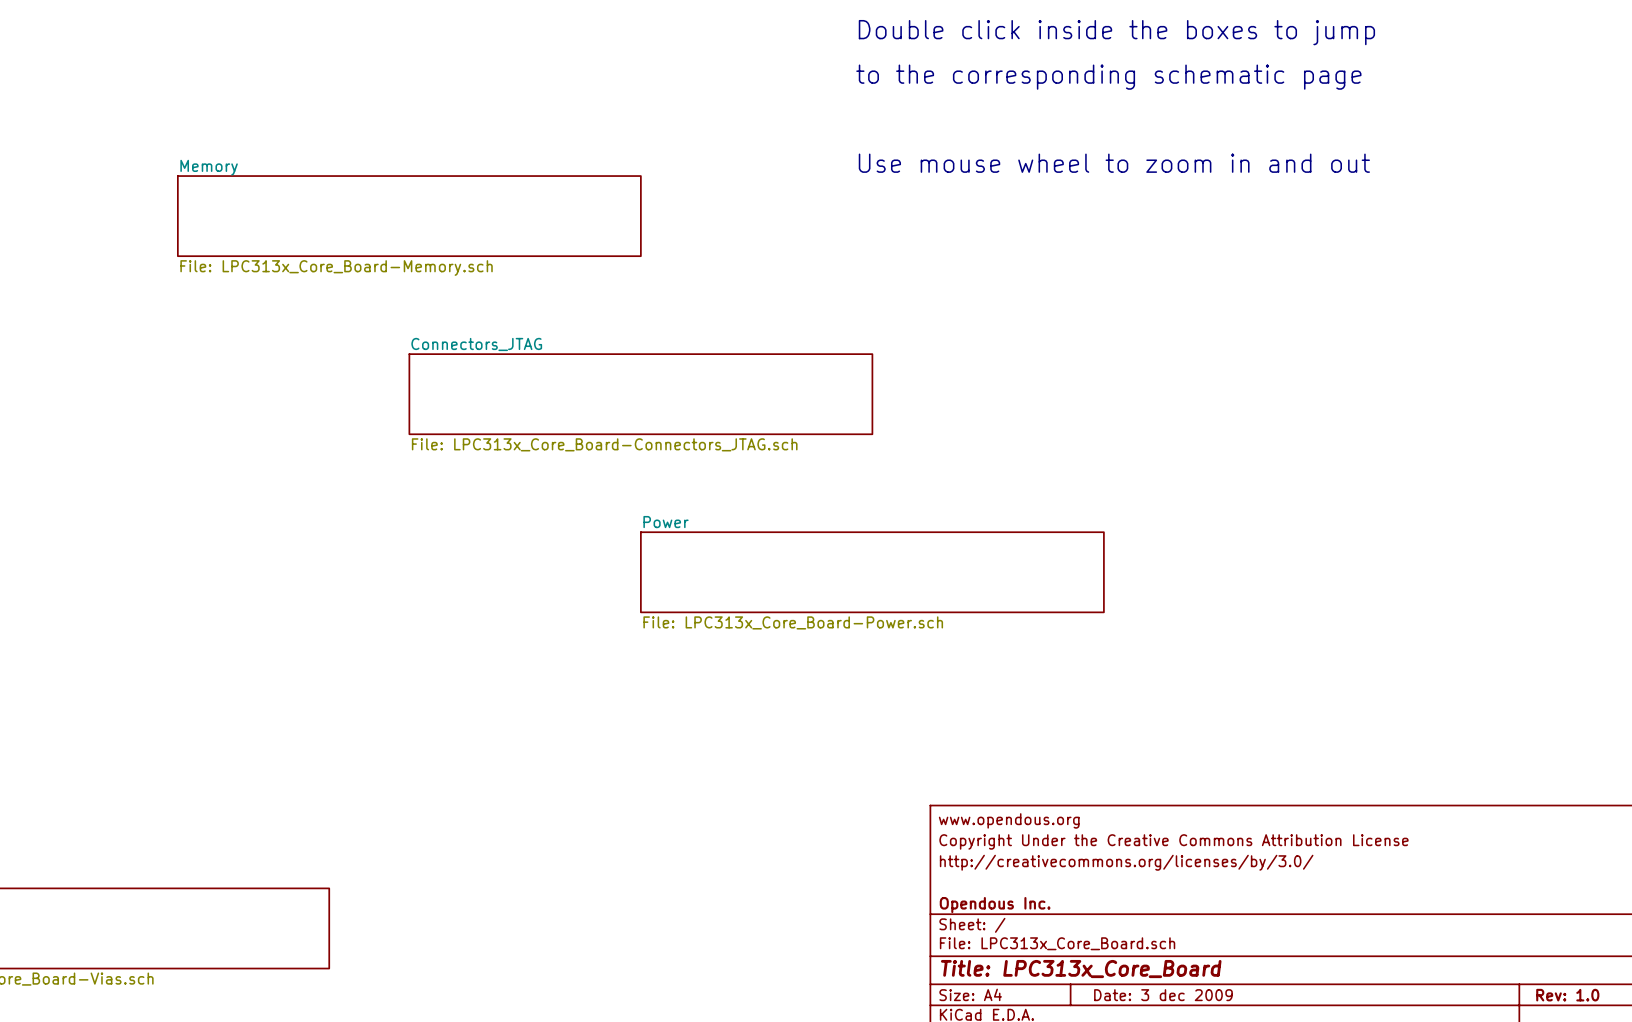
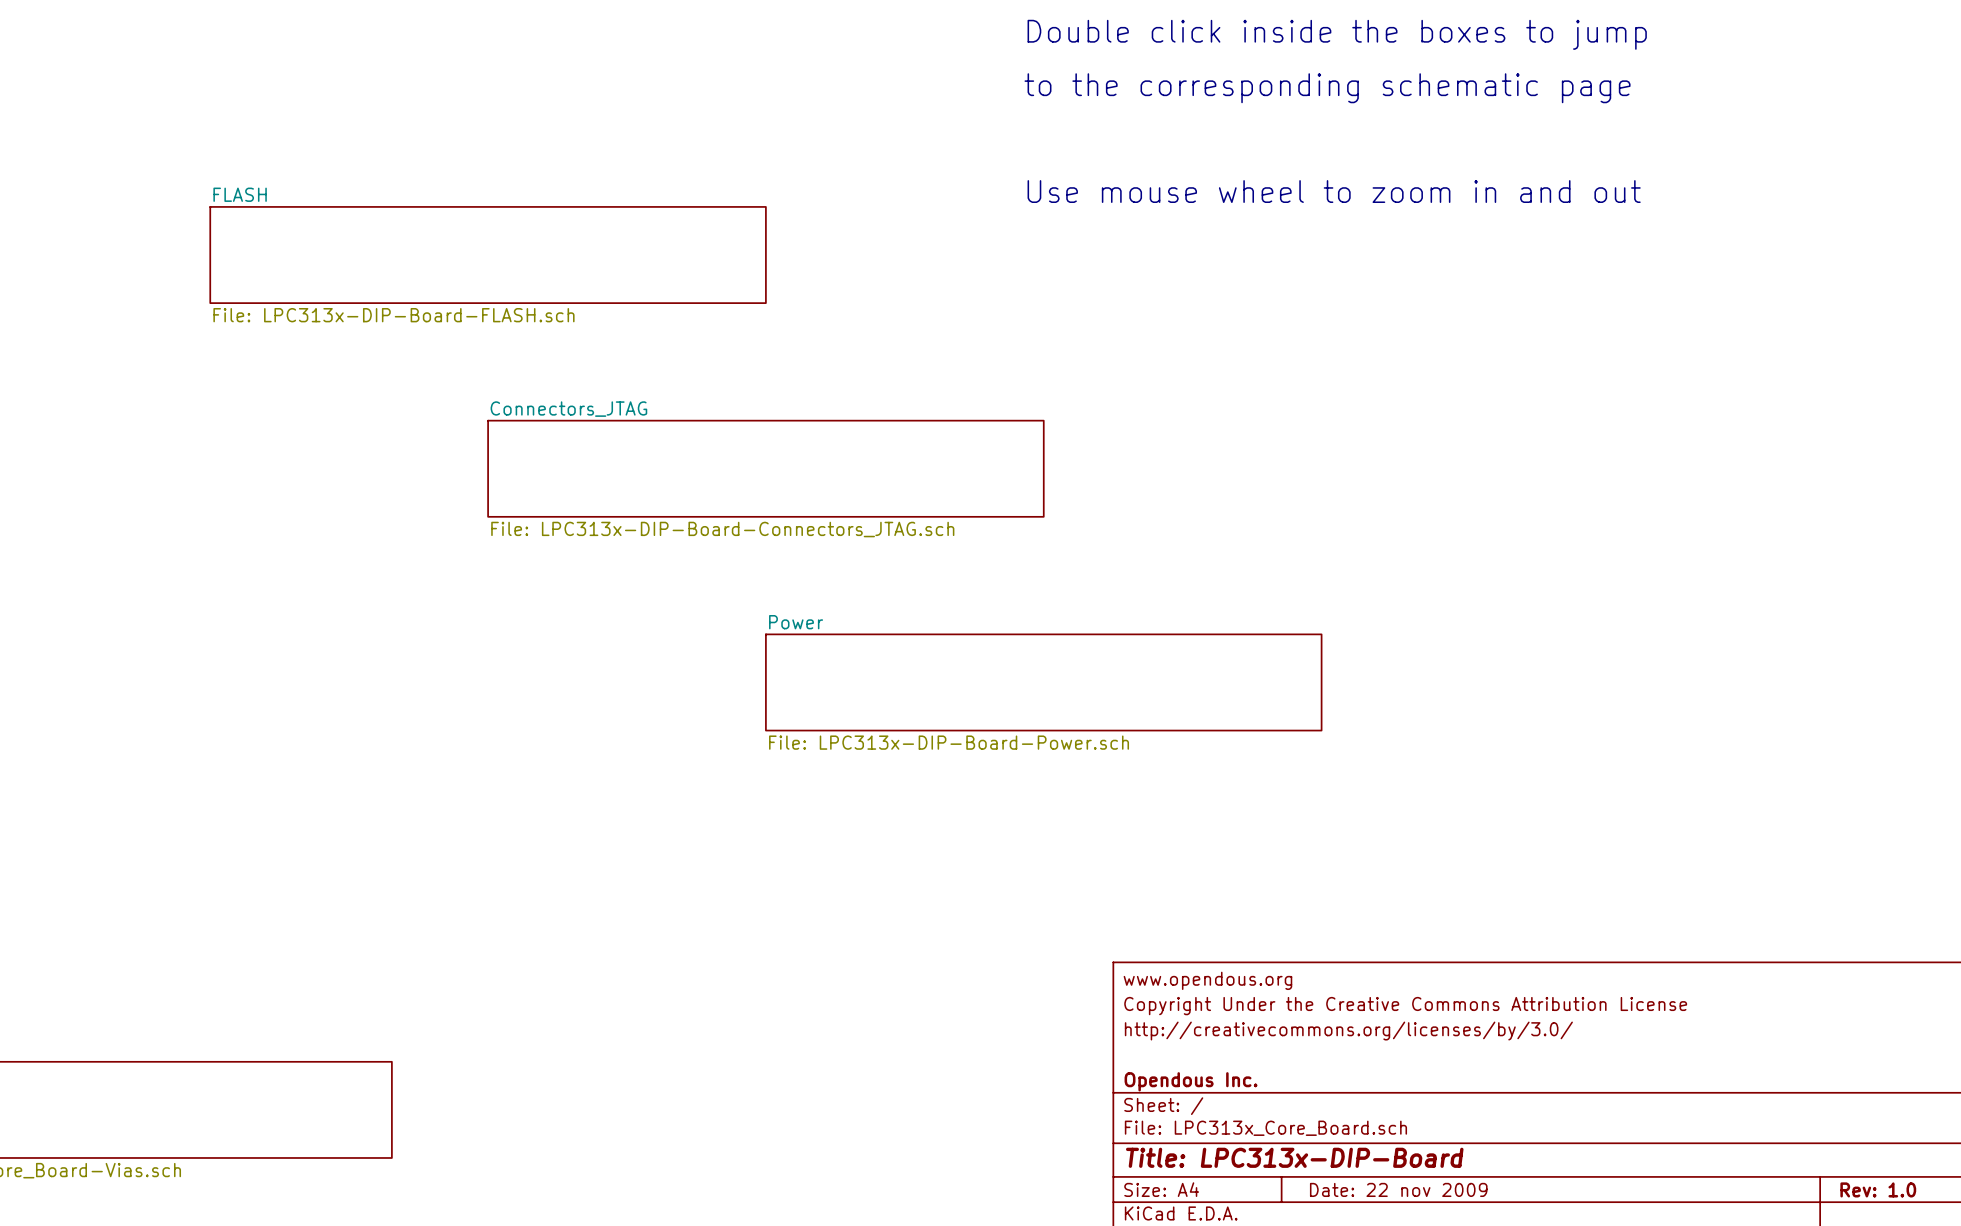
sheet Memory name: Memory (209, 167) -> FLASH (240, 194)
sheet Memory value: File: LPC313x_Core_Board-Memory.sch (336, 268) -> File: LPC313x-DIP-Board-FLASH.sch (393, 315)
sheet Connectors_JTAG value: File: LPC313x_Core_Board-Connectors_JTAG.sch (604, 444) -> File: LPC313x-DIP-Board-Connectors_JTAG.sch (722, 529)
sheet Power value: File: LPC313x_Core_Board-Power.sch (793, 622) -> File: LPC313x-DIP-Board-Power.sch (949, 742)
title block: Title: LPC313x_Core_Board (1081, 969) -> Title: LPC313x-DIP-Board (1294, 1157)
title block: Date: 3 dec 2009 (1163, 995) -> Date: 22 nov 2009 (1398, 1189)

